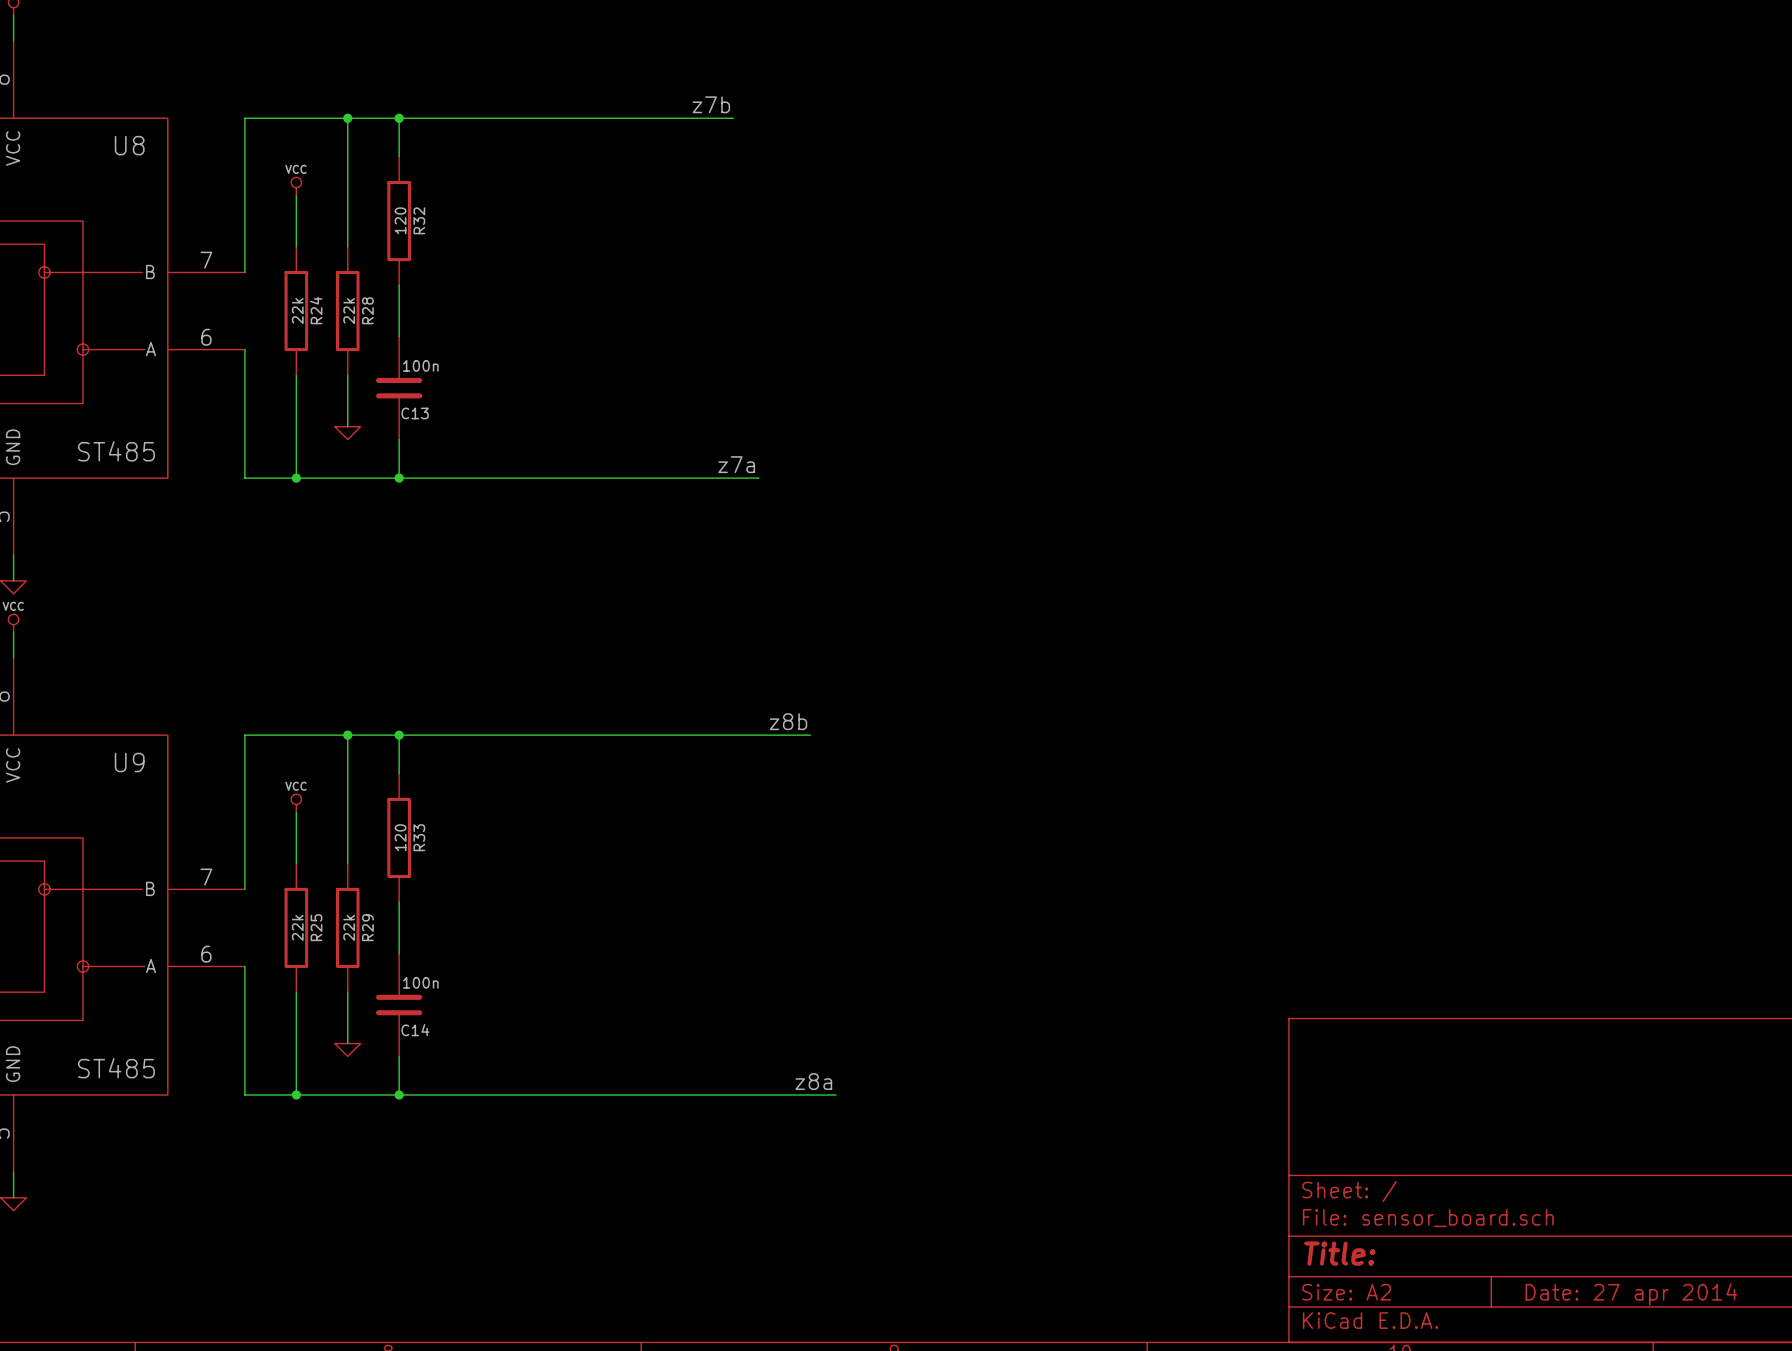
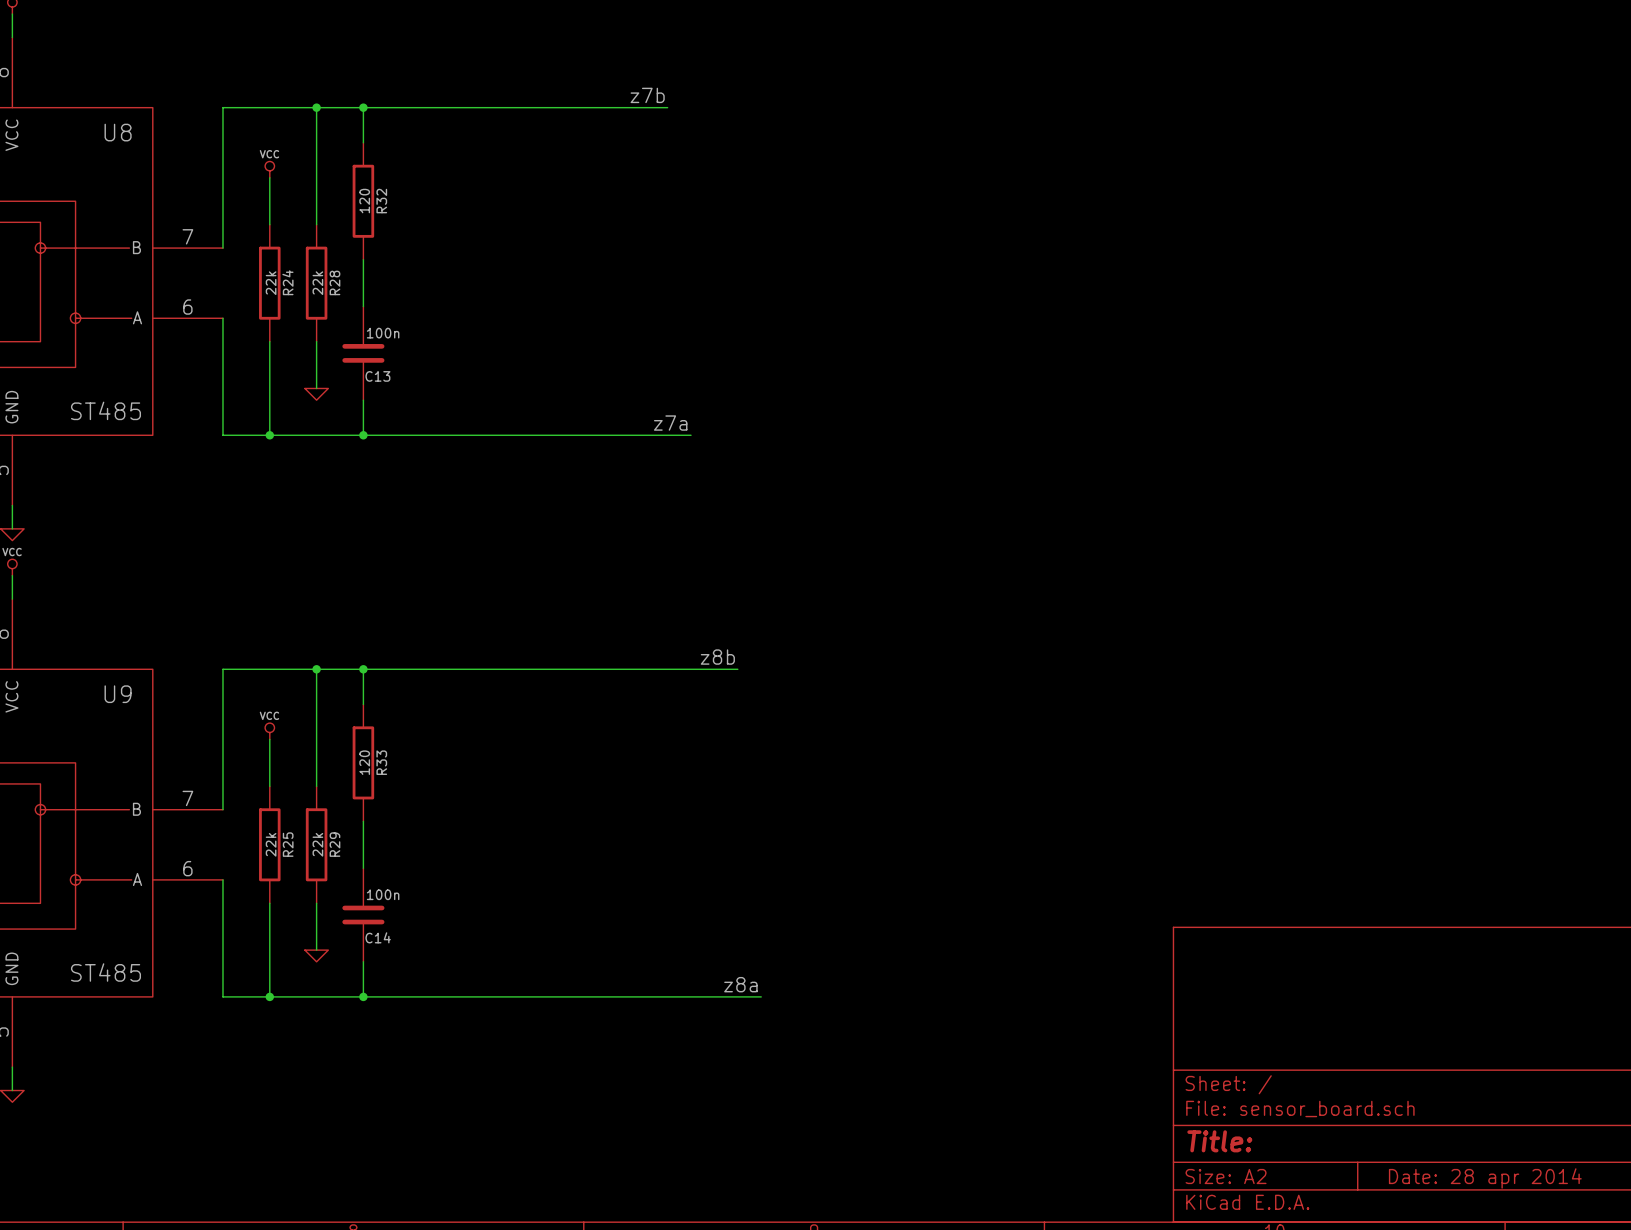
title block: Date: 27 apr 2014 (1631, 1294) -> Date: 28 apr 2014 (1485, 1178)

